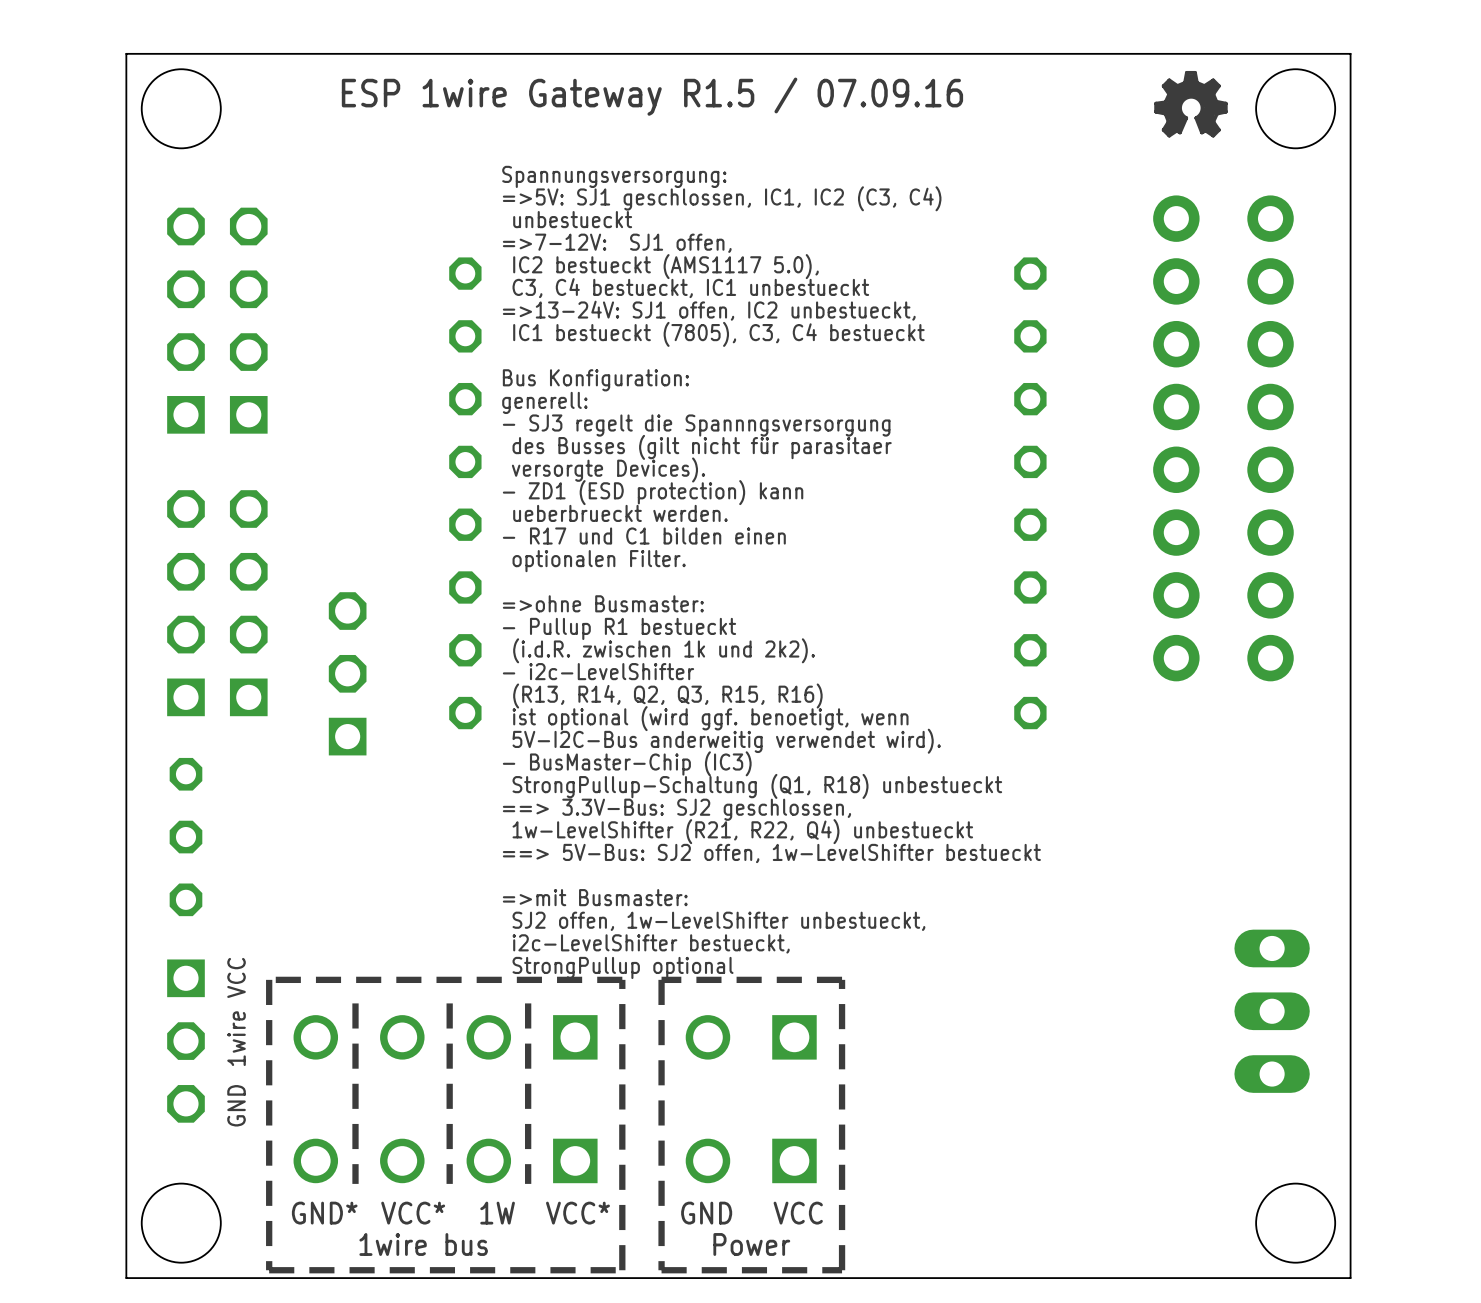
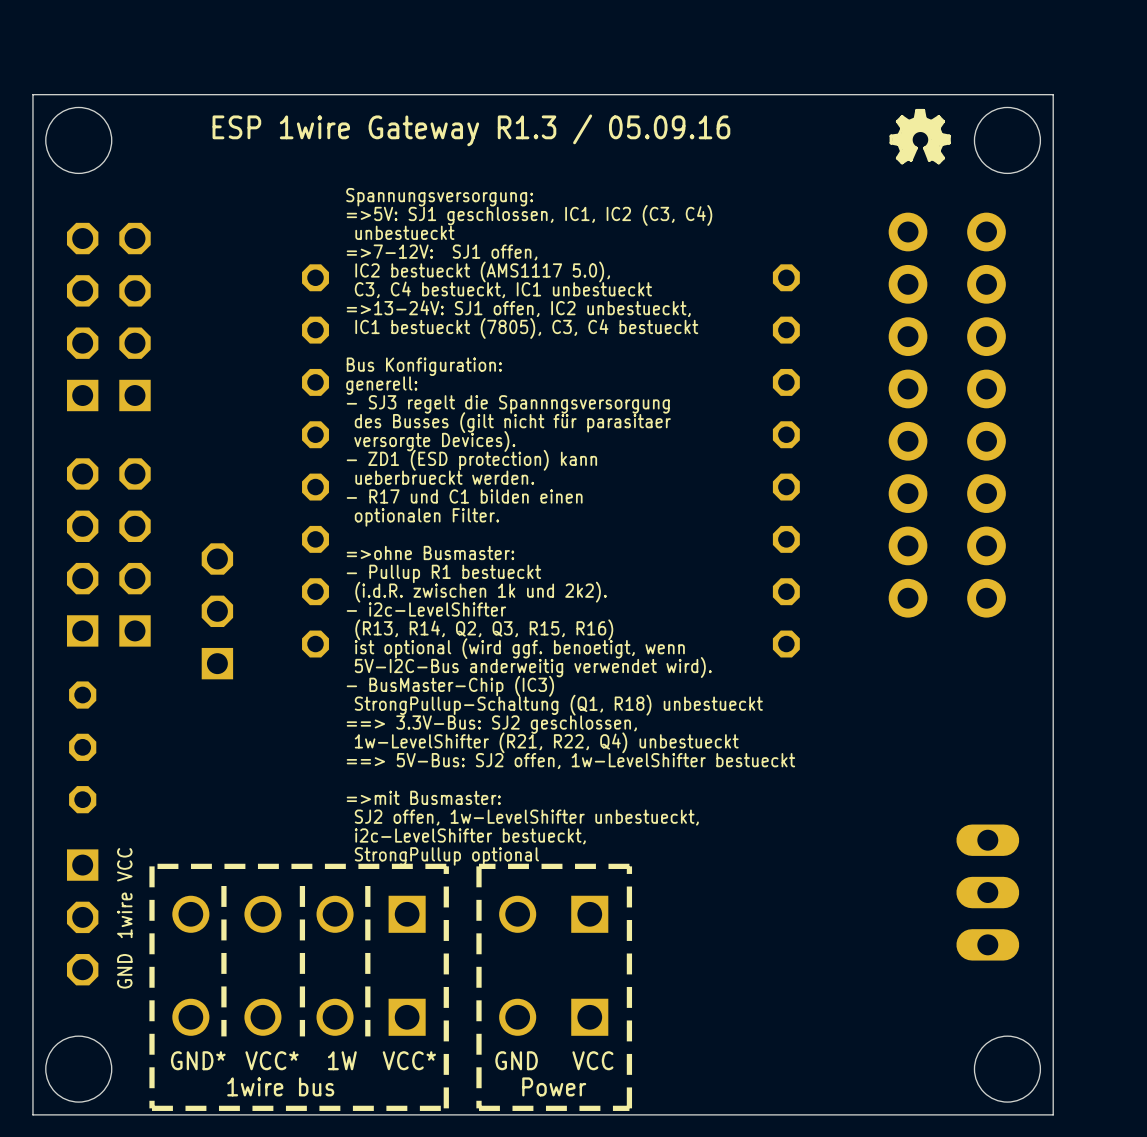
text: ESP 1wire Gateway R1.5 / 07.09.16 (652, 96) -> ESP 1wire Gateway R1.3 / 05.09.16 (471, 130)

